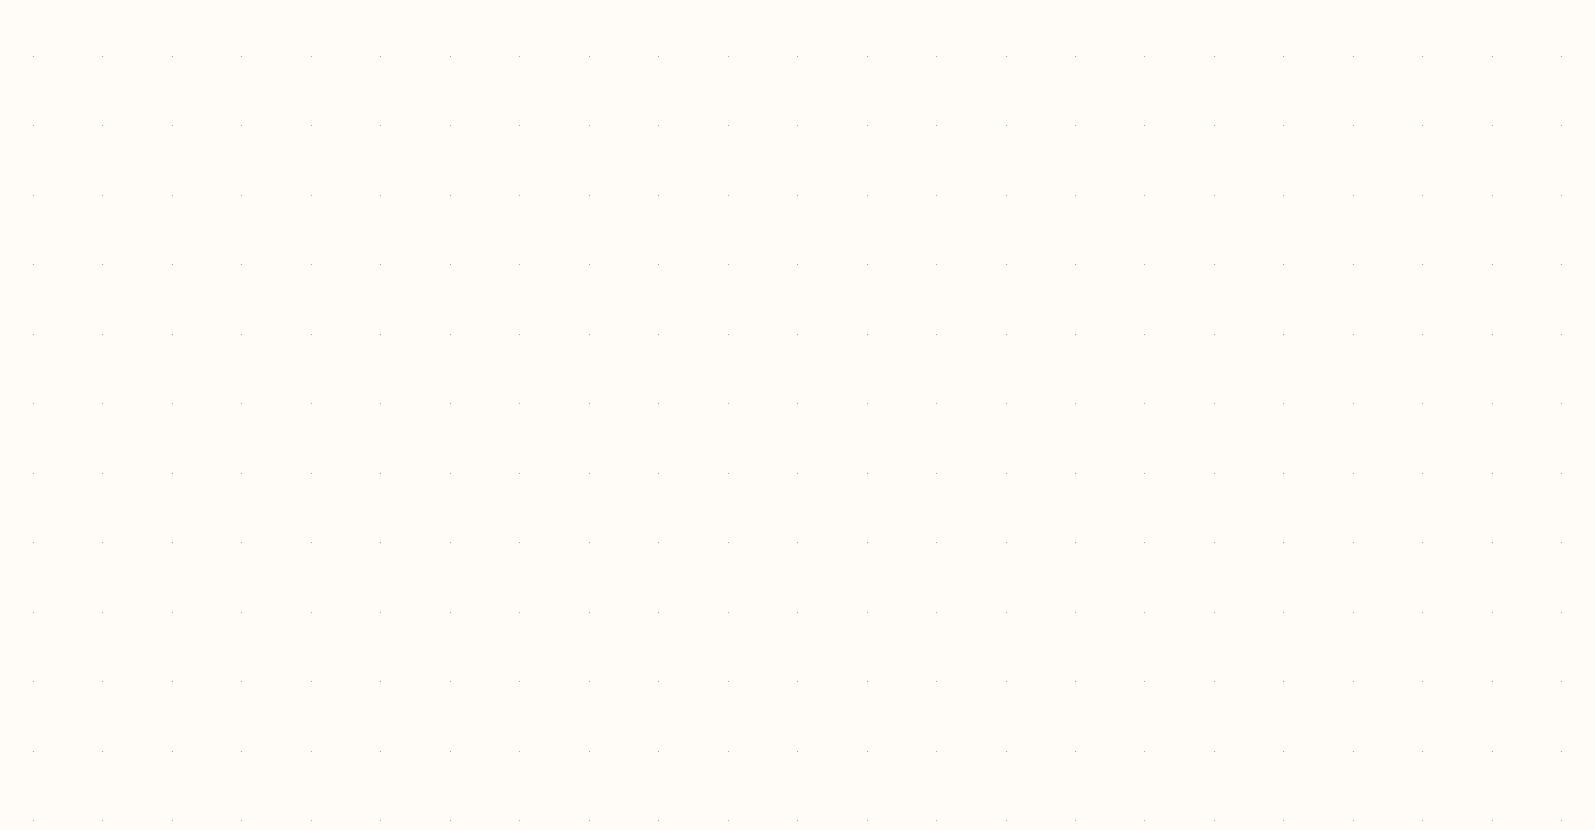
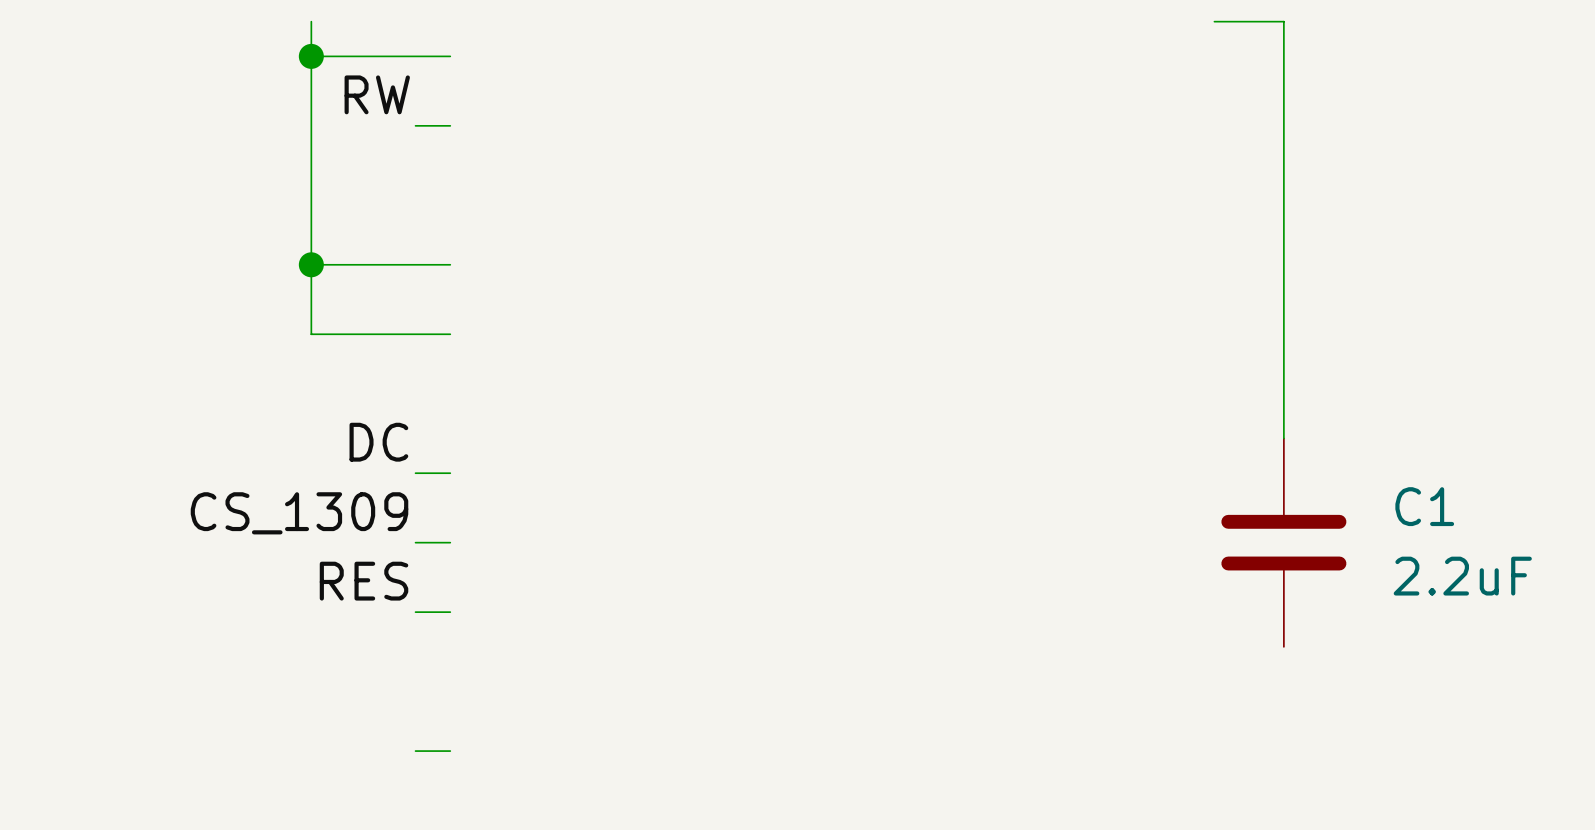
wire: none -> (311, 21) (311, 334) (450, 334)
wire: none -> (1214, 21) (1283, 21) (1283, 438)
wire: none -> (311, 56) (450, 56)
junction: none -> (311, 56)
label: none -> RW (377, 94)
wire: none -> (415, 125) (450, 125)
wire: none -> (311, 264) (450, 264)
junction: none -> (311, 264)
label: none -> DC (378, 442)
wire: none -> (415, 473) (450, 473)
label: none -> CS_1309 (299, 513)
wire: none -> (415, 542) (450, 542)
C1: none -> 2.2uF (1283, 542)
label: none -> RES (364, 581)
wire: none -> (415, 612) (450, 612)
wire: none -> (415, 751) (450, 751)

